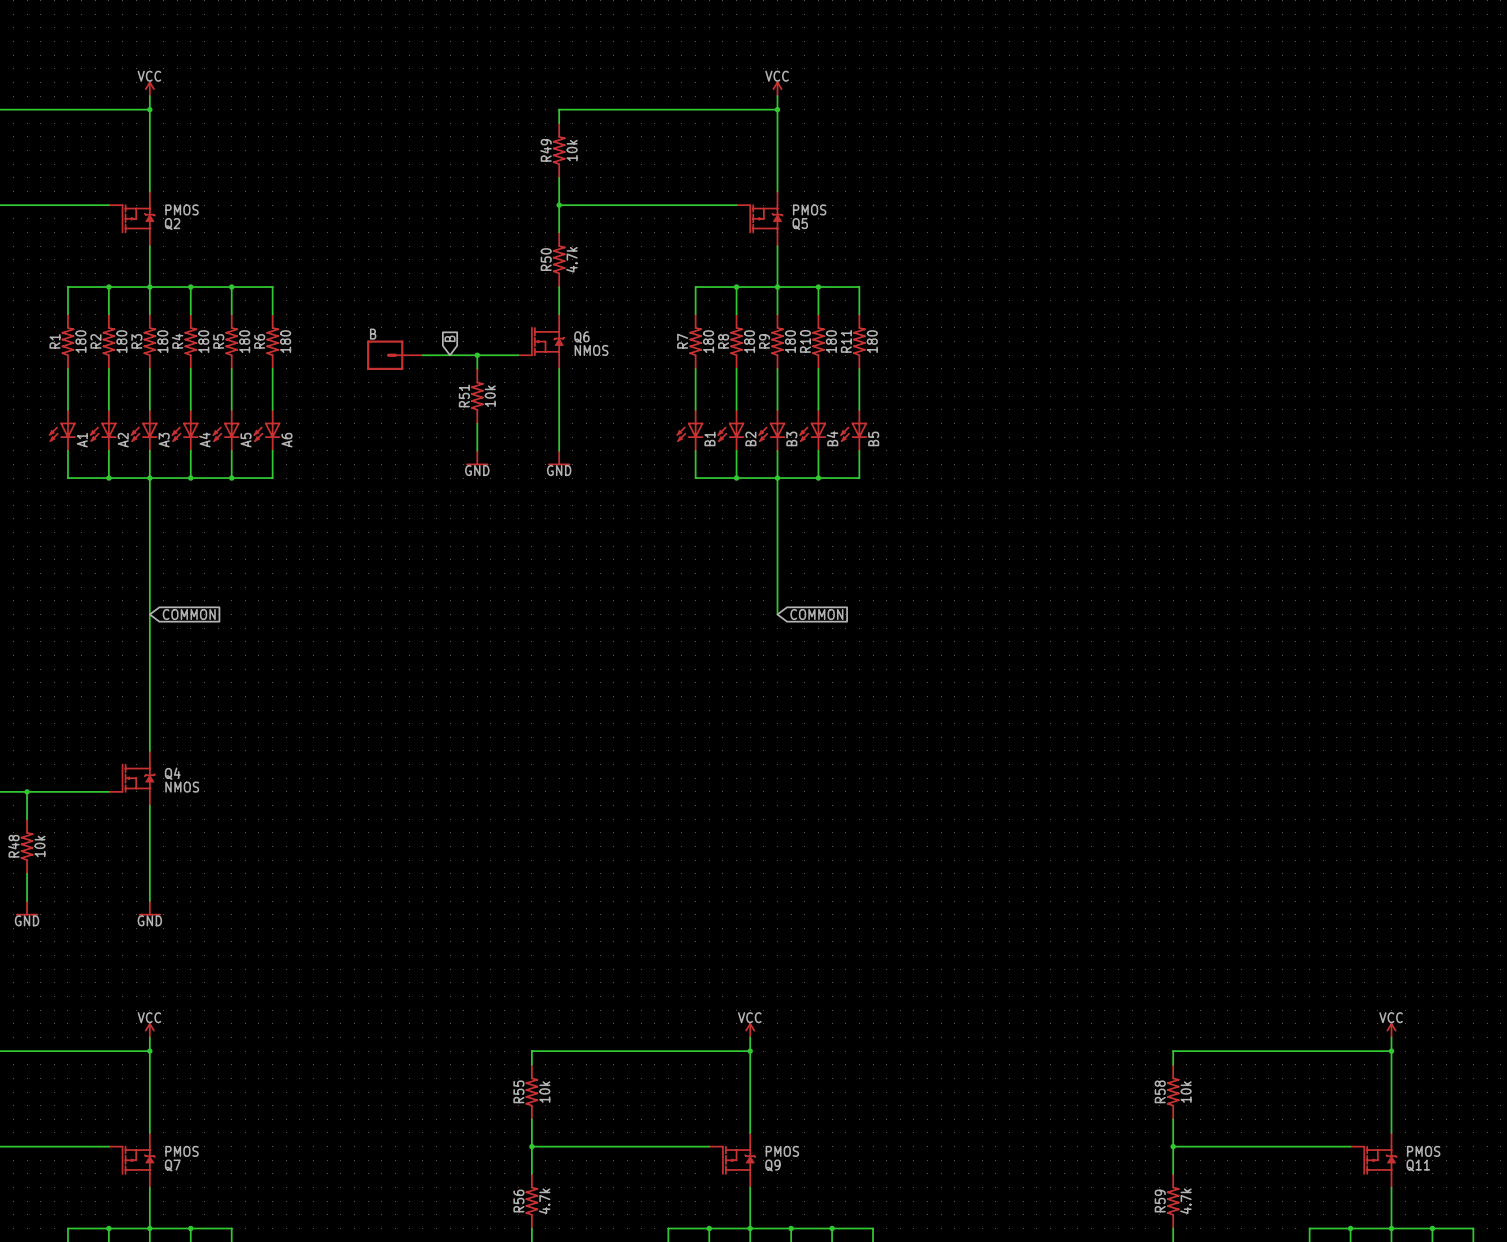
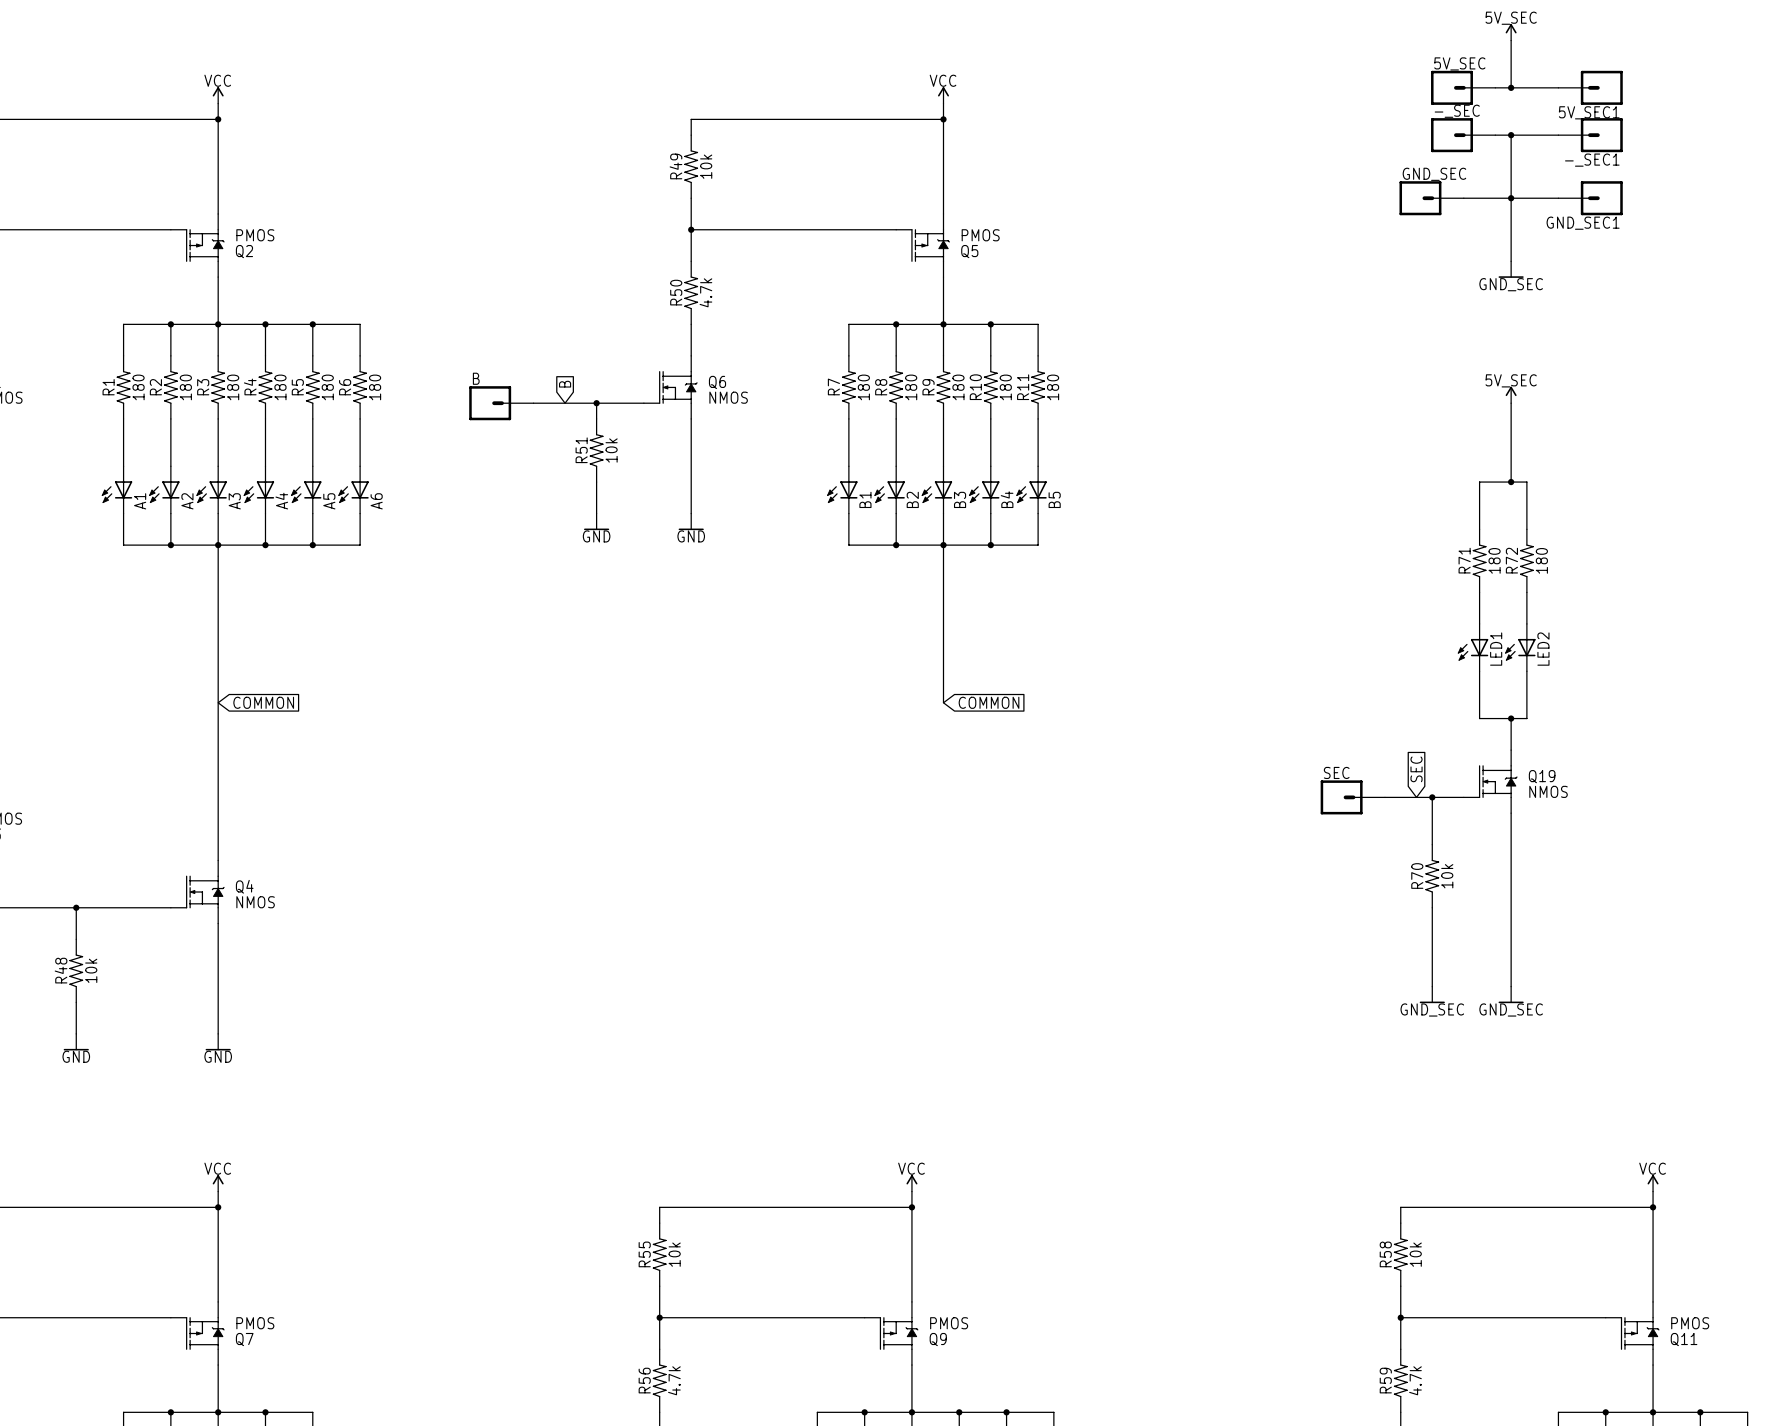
power symbol: none -> 5V_SEC (1511, 32)
wire: none -> (1511, 40) (1511, 87)
5V_SEC: none -> (1463, 87)
wire: none -> (1495, 87) (1558, 87)
junction: none -> (1511, 87)
5V_SEC1: none -> (1590, 87)
-_SEC: none -> (1463, 135)
wire: none -> (1495, 135) (1558, 135)
wire: none -> (1511, 135) (1511, 261)
junction: none -> (1511, 135)
-_SEC1: none -> (1590, 135)
GND_SEC: none -> (1431, 198)
wire: none -> (1463, 198) (1558, 198)
junction: none -> (1511, 198)
GND_SEC1: none -> (1590, 198)
power symbol: none -> GND_SEC (1511, 269)
power symbol: none -> 5V_SEC (1511, 394)
wire: none -> (1511, 403) (1511, 482)
junction: none -> (1511, 482)
wire: none -> (1479, 529) (1479, 482) (1526, 482) (1526, 529)
R71: none -> 180 (1479, 560)
R72: none -> 180 (1526, 560)
wire: none -> (1479, 592) (1479, 623)
wire: none -> (1526, 592) (1526, 623)
LED1: none -> (1473, 647)
LED2: none -> (1520, 647)
wire: none -> (1479, 671) (1479, 718) (1526, 718) (1526, 671)
wire: none -> (1511, 718) (1511, 750)
junction: none -> (1511, 718)
global label: none -> SEC (1416, 769)
Q19: none -> NMOS (1490, 781)
SEC: none -> (1352, 797)
wire: none -> (1384, 797) (1463, 797)
wire: none -> (1432, 797) (1432, 844)
junction: none -> (1432, 797)
wire: none -> (1511, 813) (1511, 986)
R70: none -> 10k (1432, 876)
wire: none -> (1432, 907) (1432, 986)
power symbol: none -> GND_SEC (1432, 994)
power symbol: none -> GND_SEC (1511, 994)

